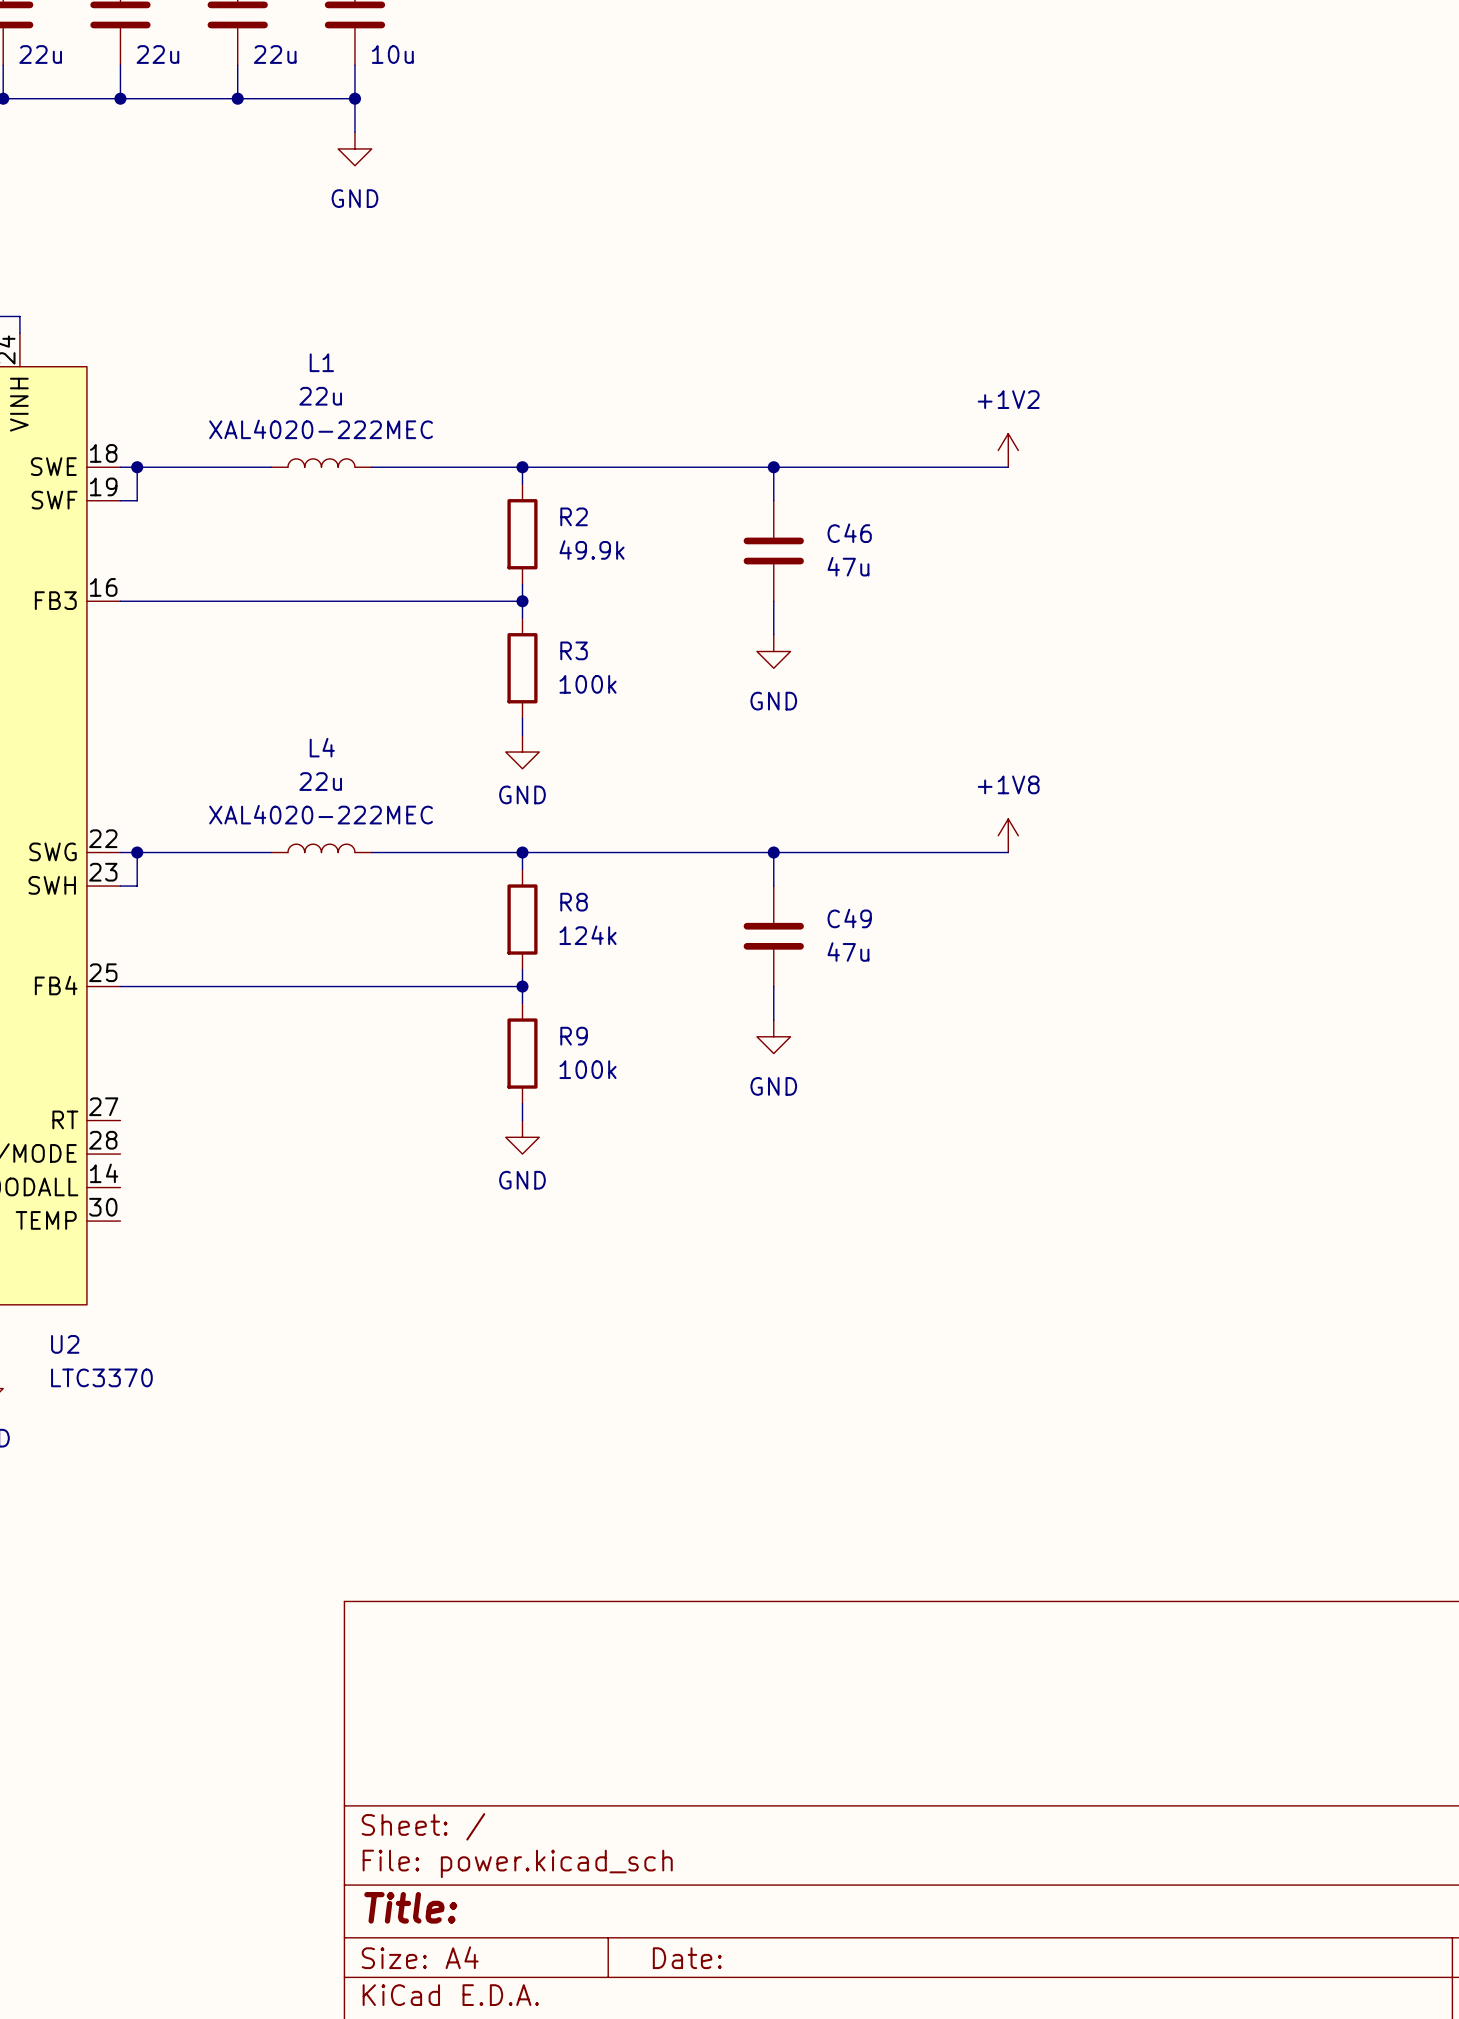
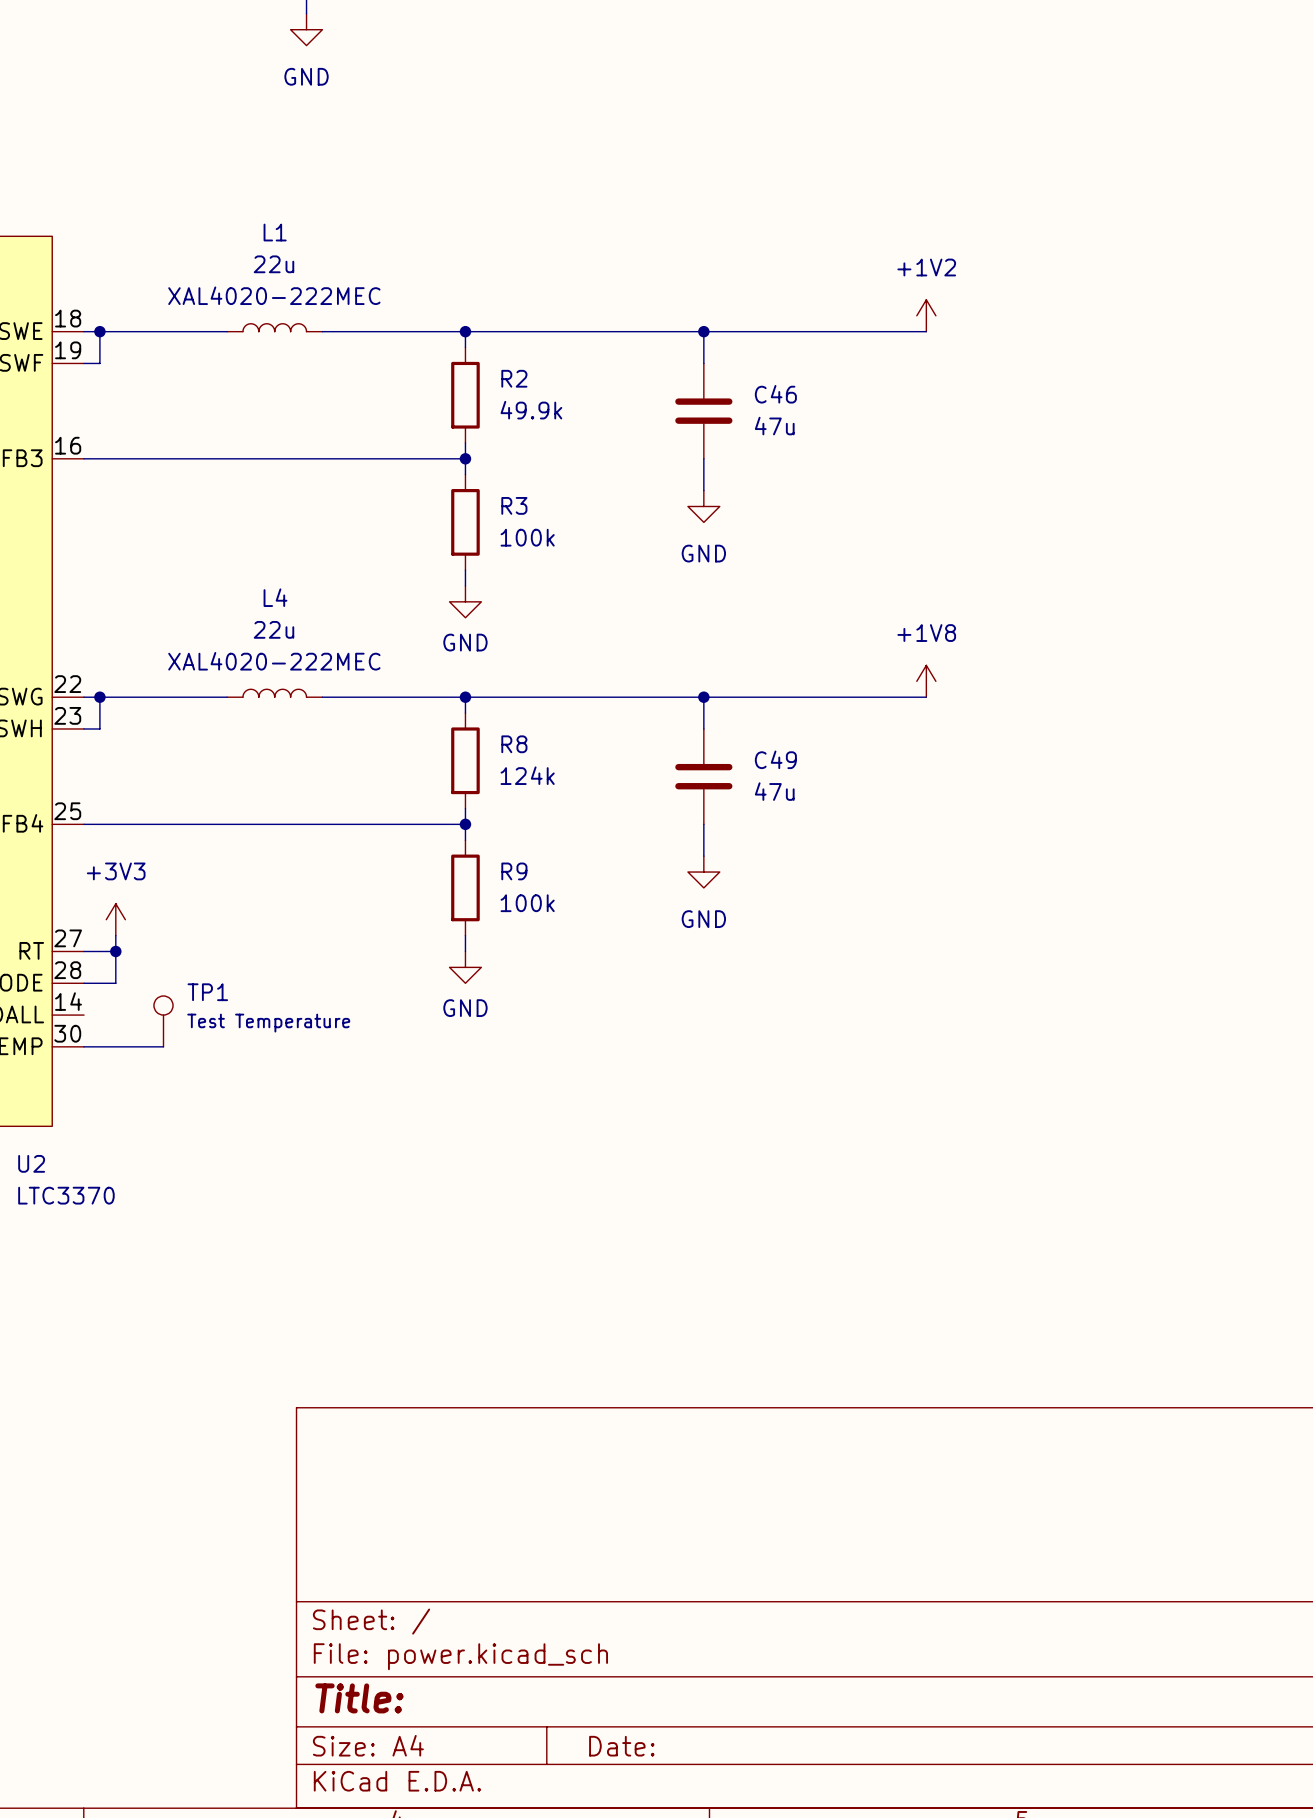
power symbol: none -> +3V3 (115, 919)
wire: none -> (115, 935) (115, 983) (84, 983)
wire: none -> (84, 951) (115, 951)
junction: none -> (115, 951)
TP1: none -> Test Temperature (163, 1021)
wire: none -> (84, 1046) (163, 1046)

